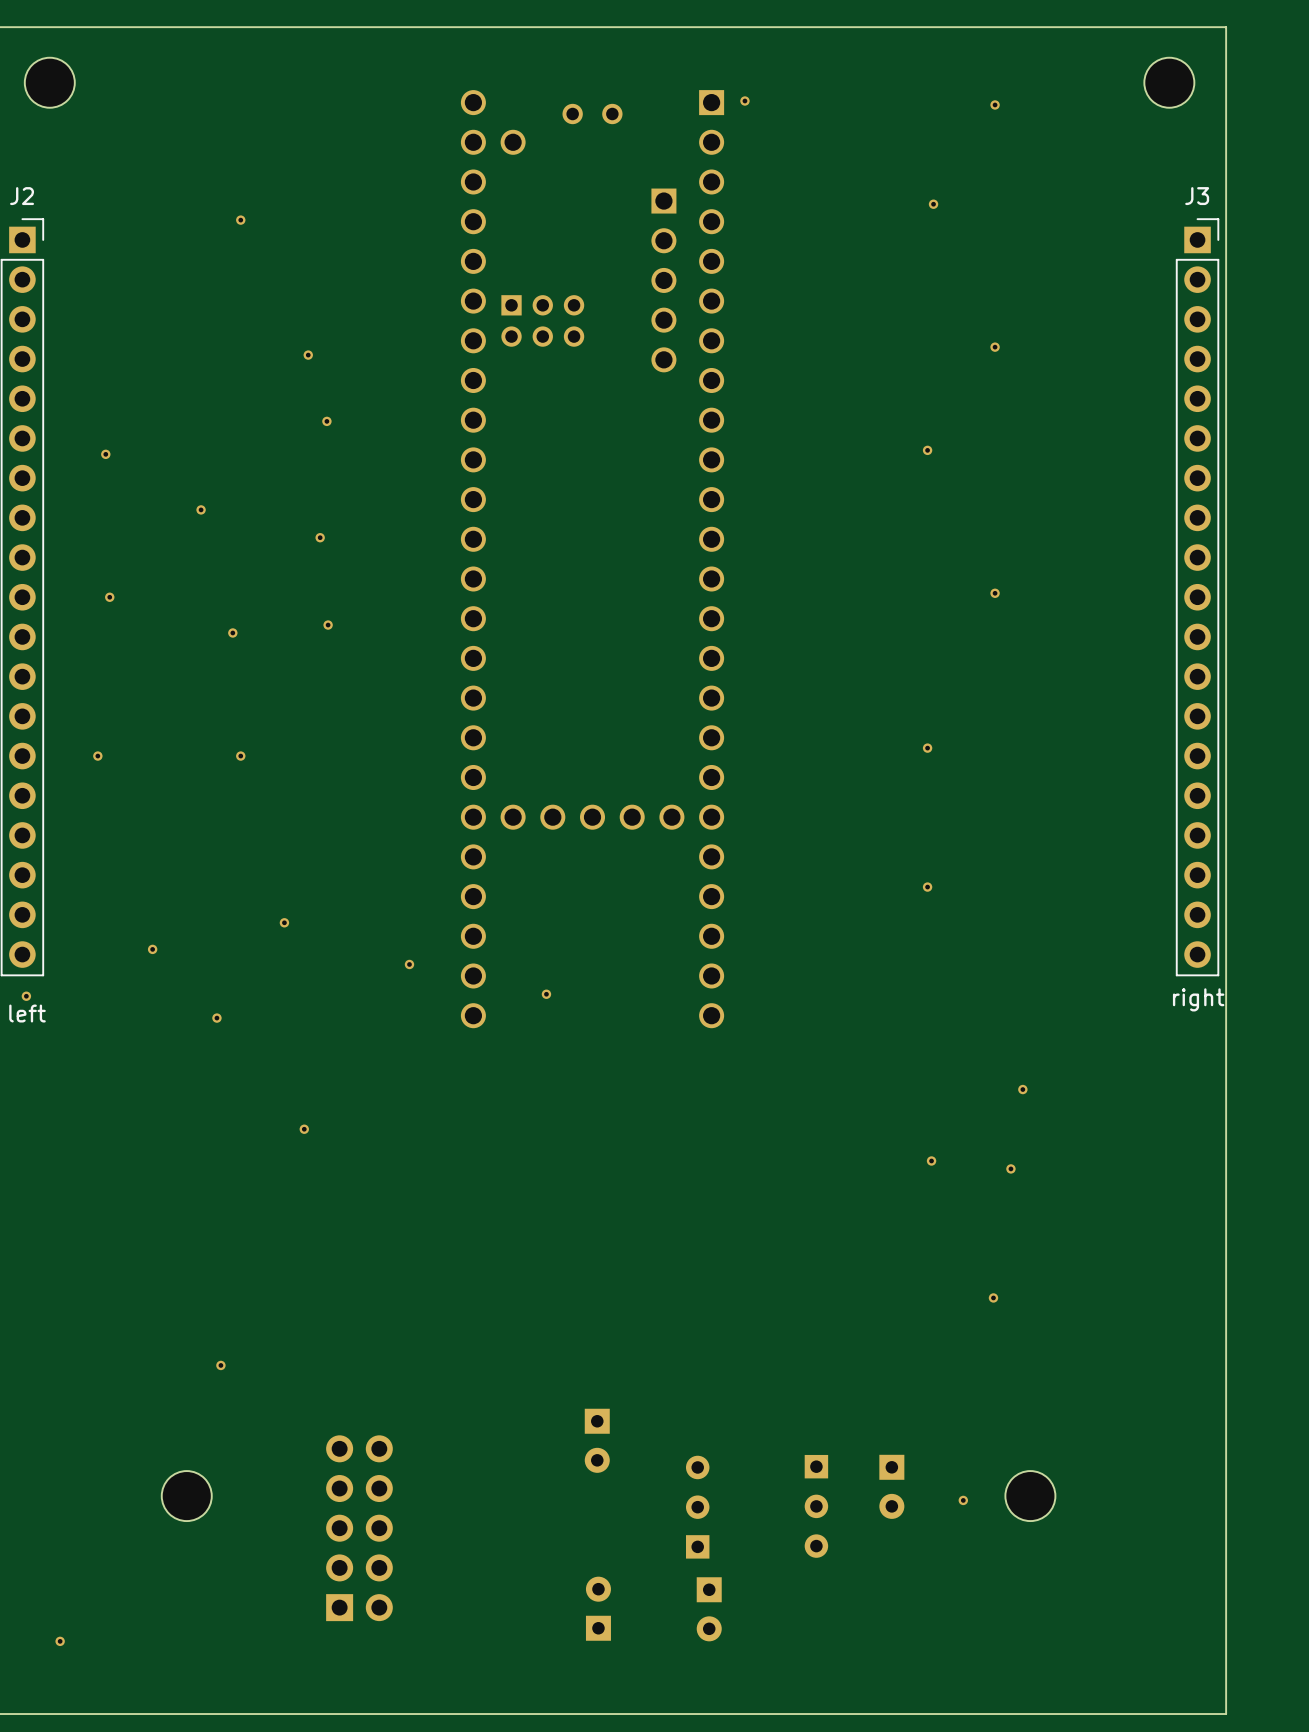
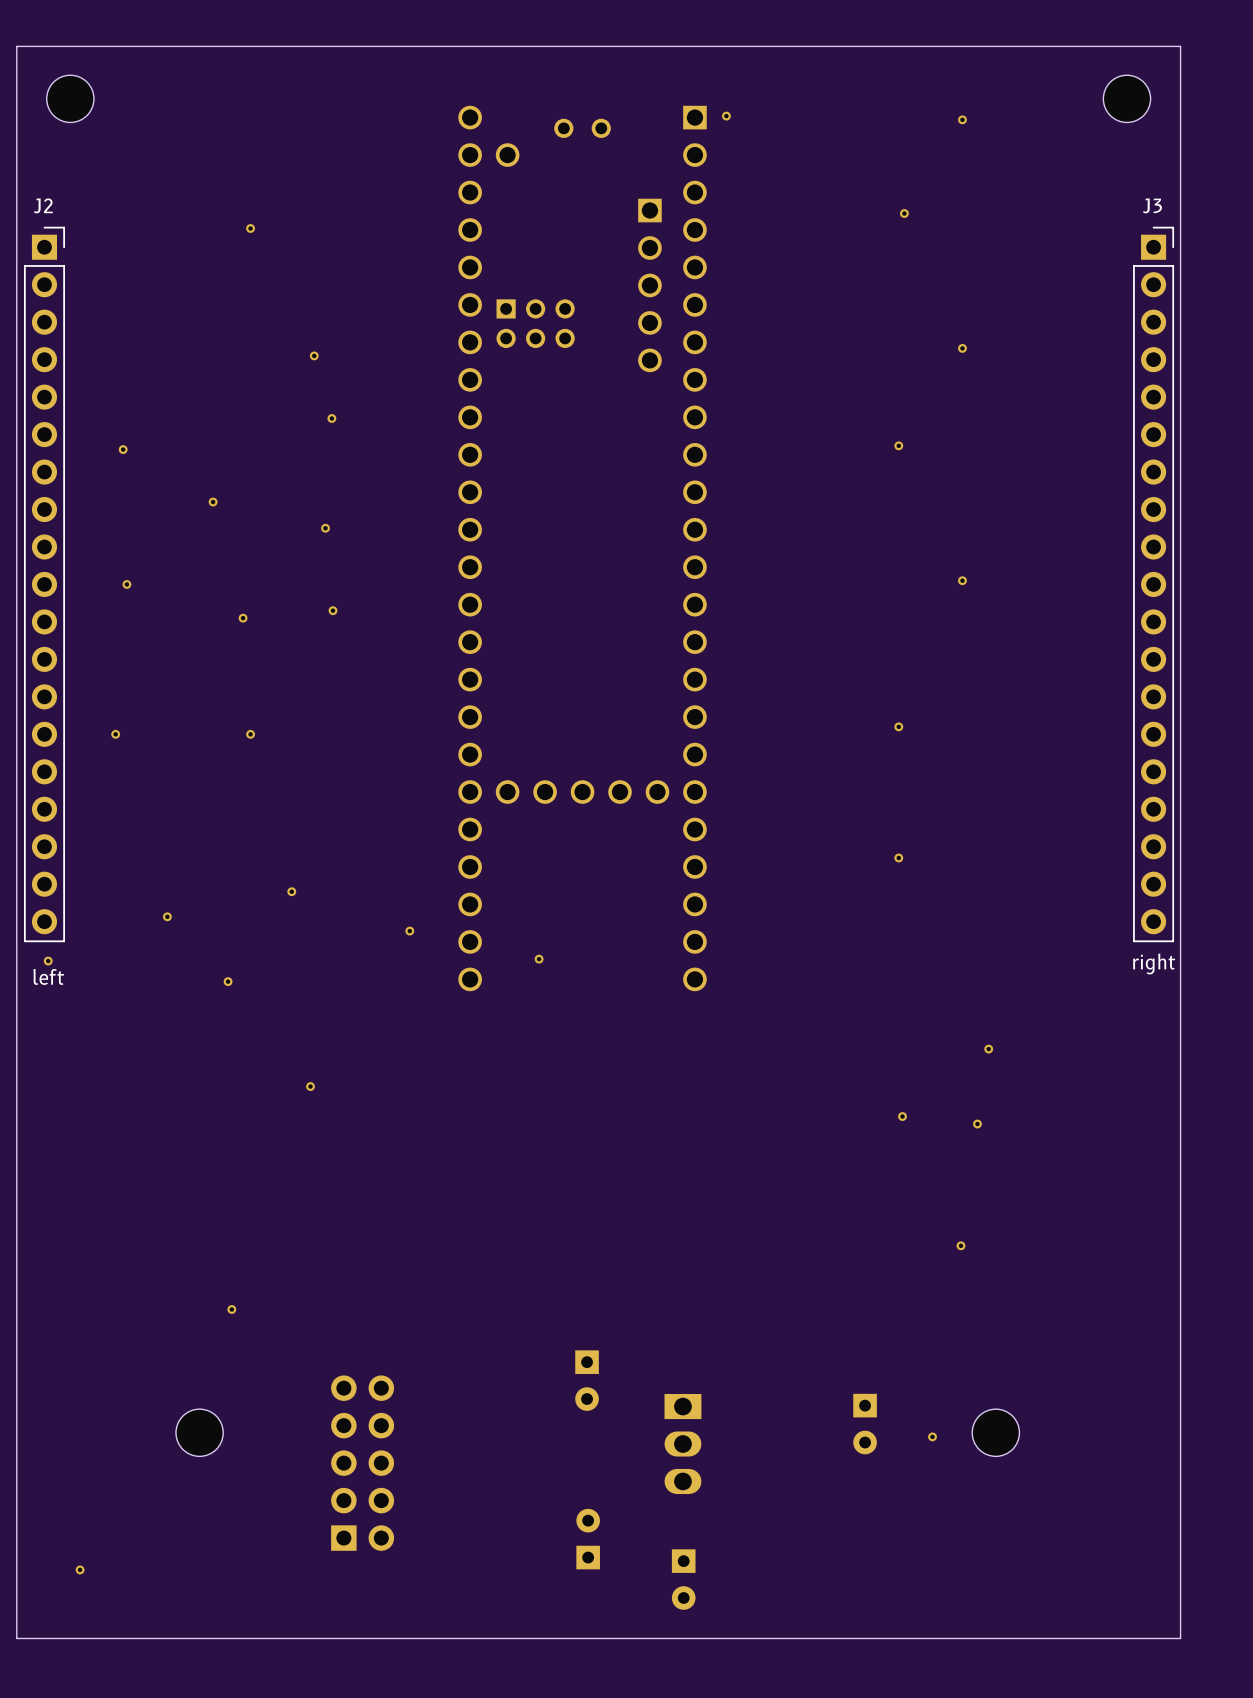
part footprint: [685, 1455, 710, 1559] -> [664, 1394, 702, 1495]
part: (816, 1506) -> none
part position: (709, 1609) -> (683, 1579)

